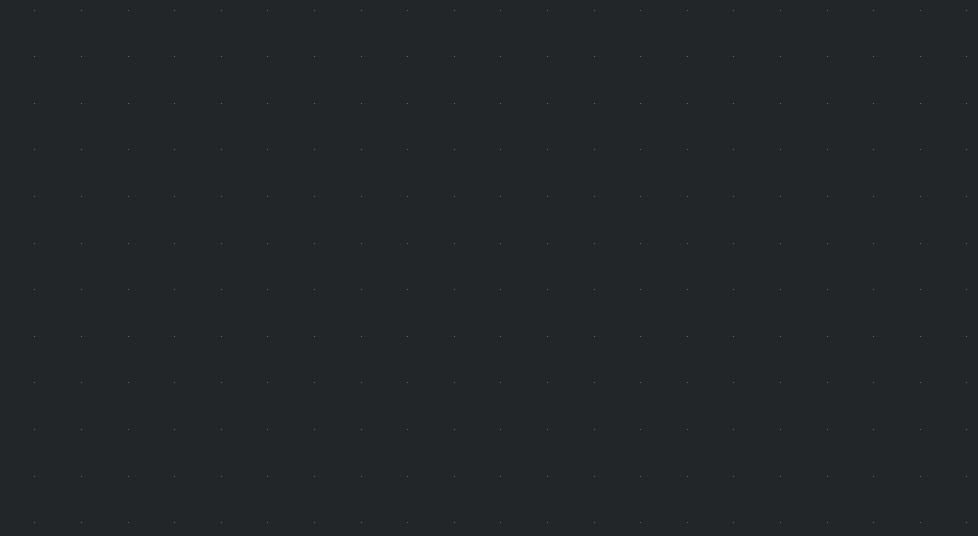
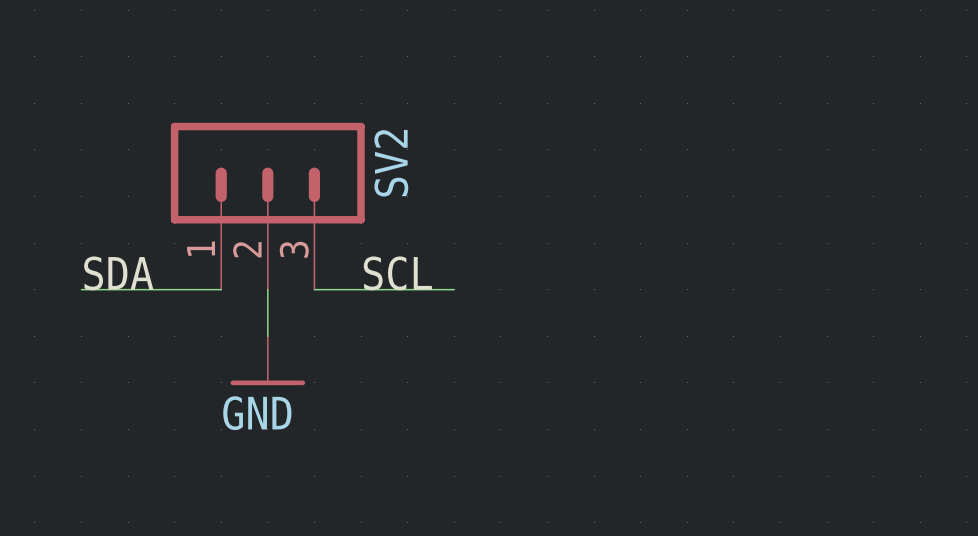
SV2: none -> (267, 206)
label: none -> SDA (118, 273)
label: none -> SCL (397, 273)
wire: none -> (81, 289) (221, 289)
wire: none -> (267, 289) (267, 336)
wire: none -> (314, 289) (454, 289)
power symbol: none -> GND (267, 360)

